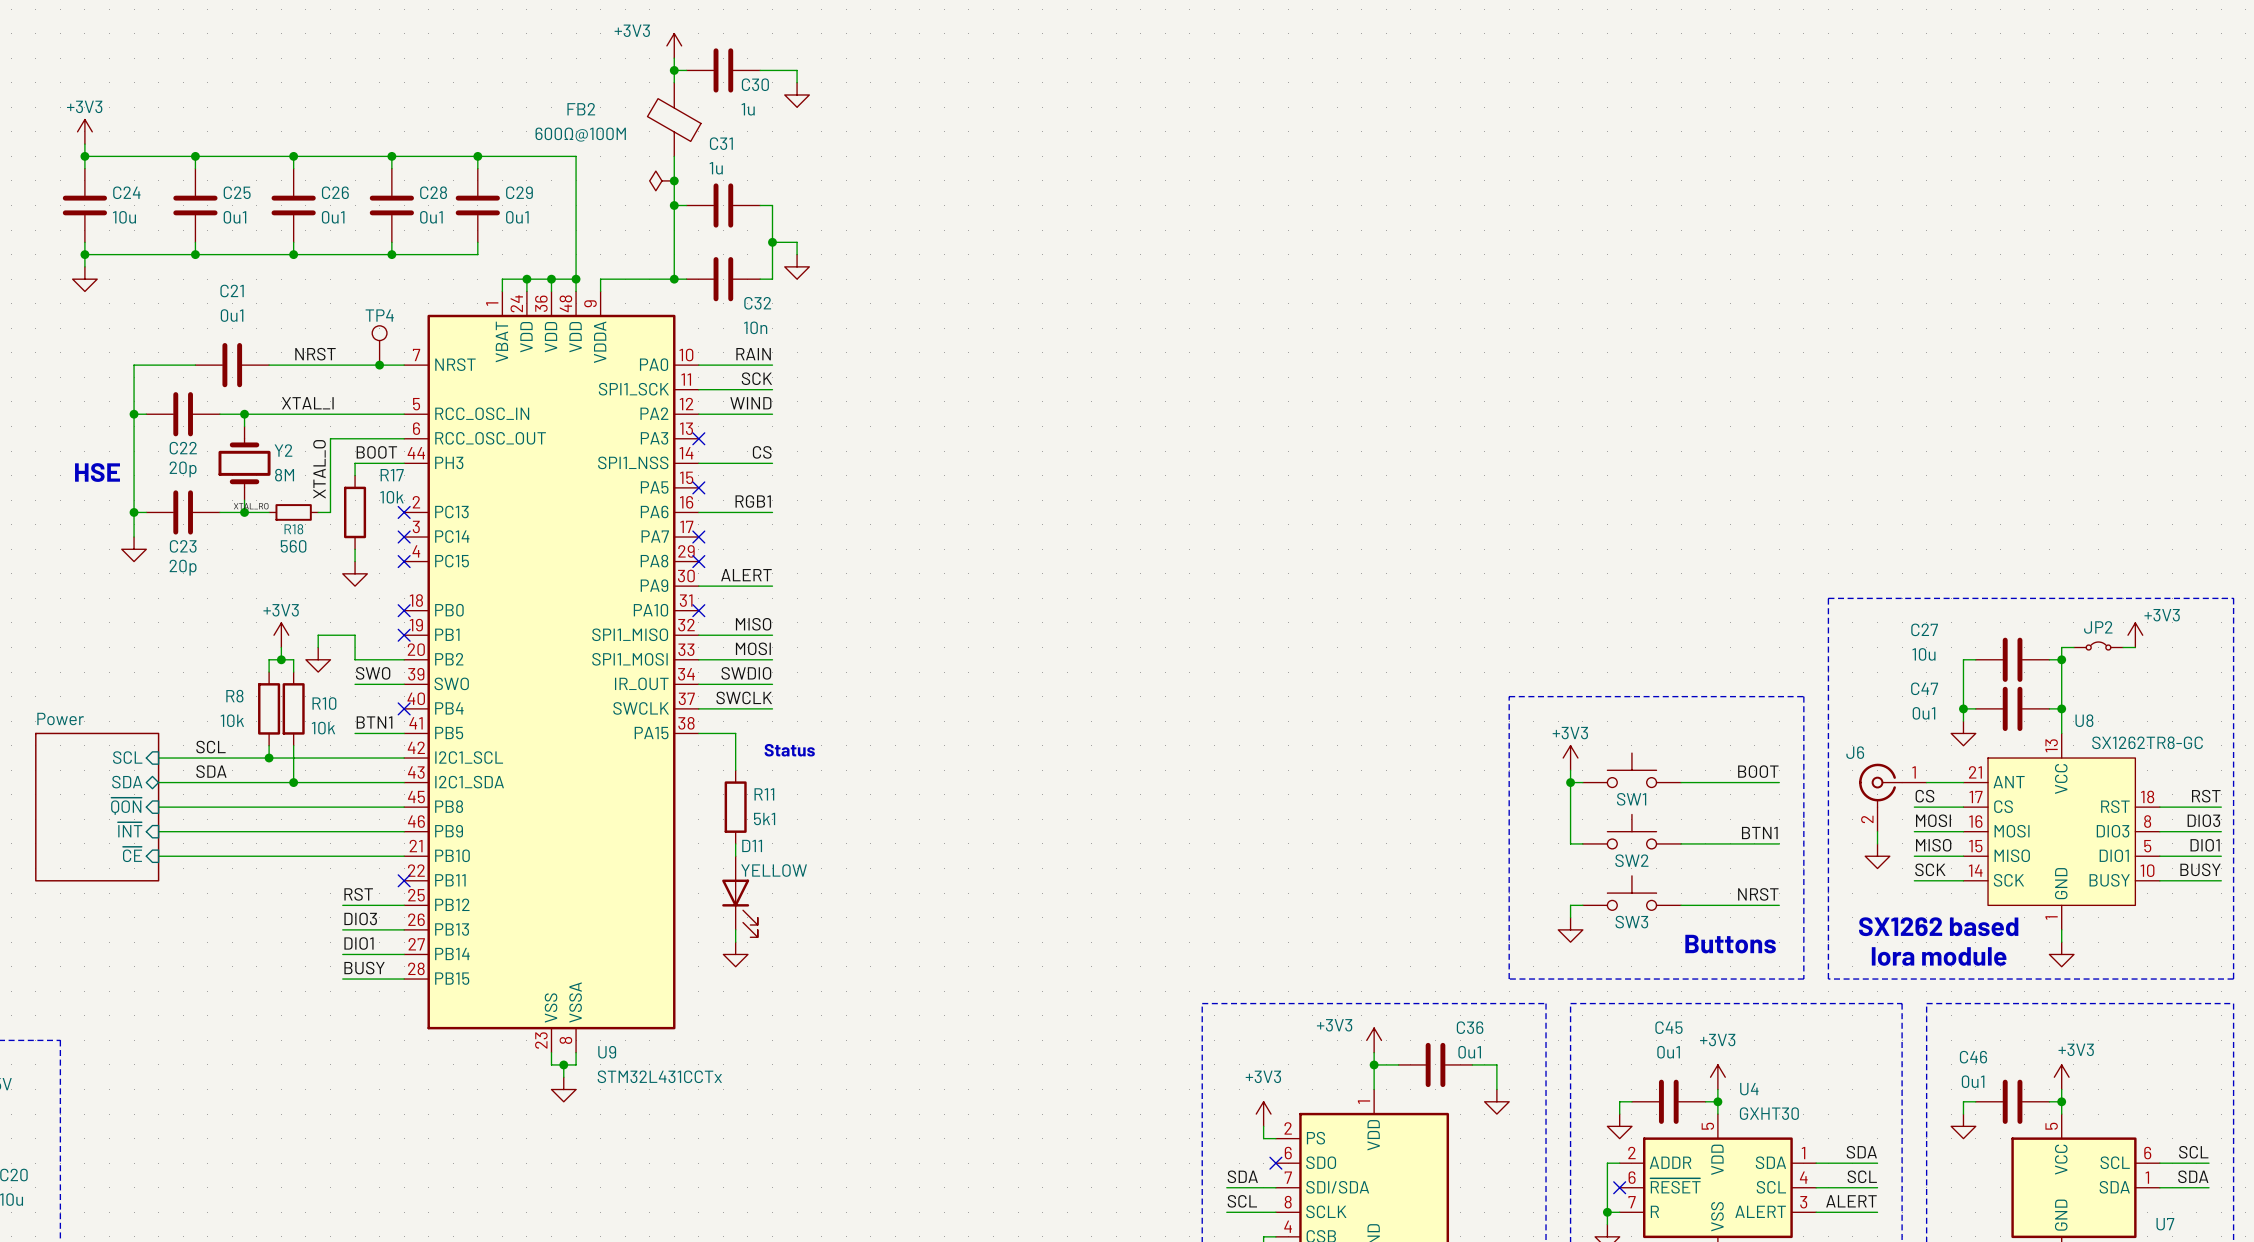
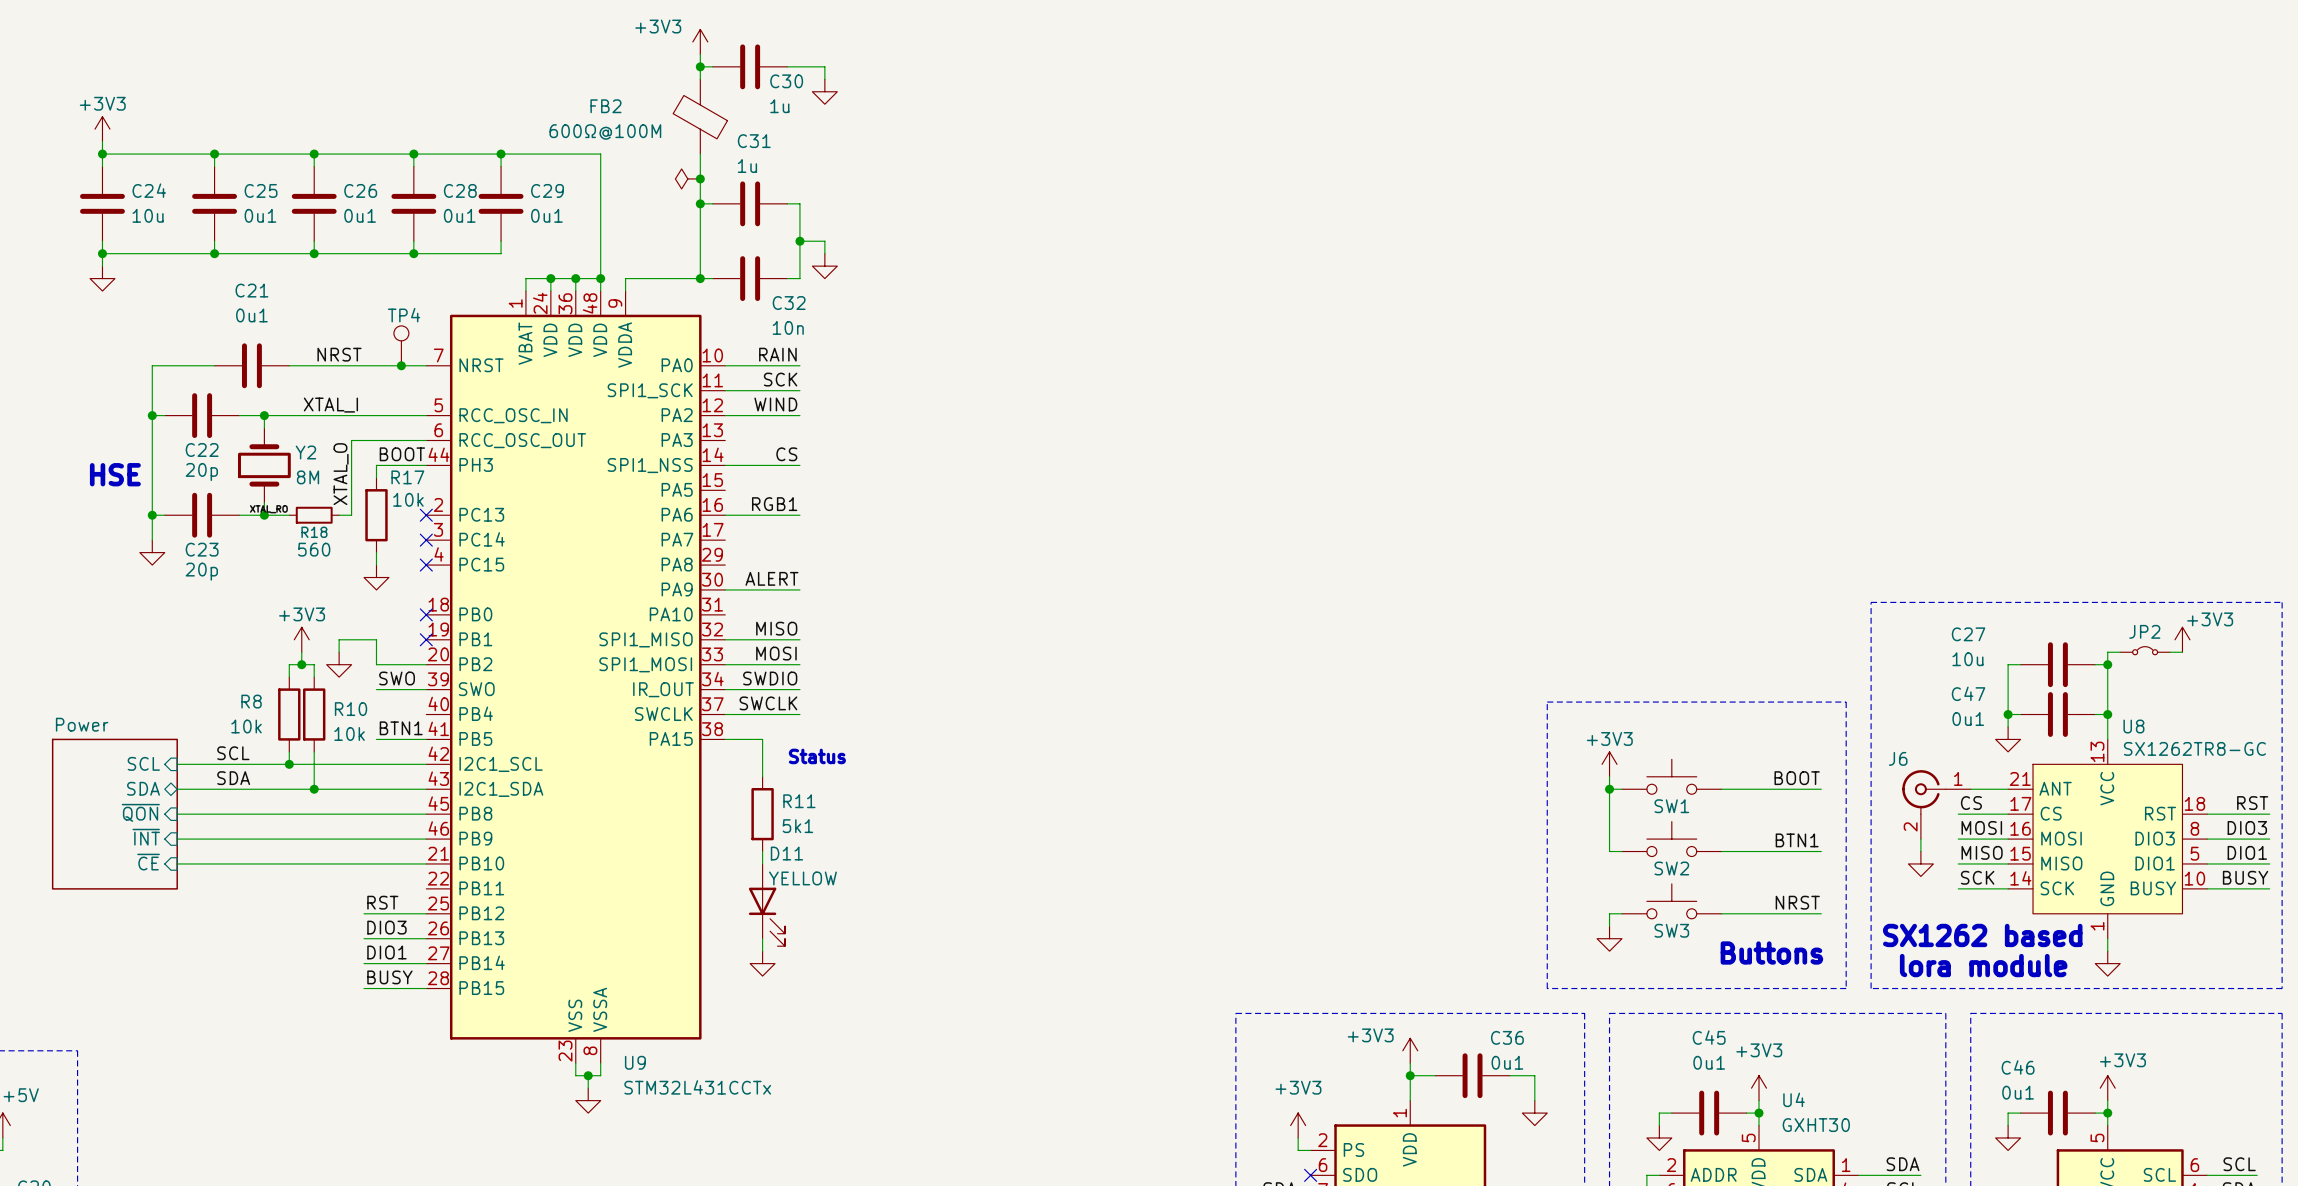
no-connect mark: (698, 438) -> none
no-connect mark: (698, 487) -> none
no-connect mark: (698, 537) -> none
no-connect mark: (698, 561) -> none
no-connect mark: (698, 610) -> none
no-connect mark: (404, 708) -> none
no-connect mark: (404, 880) -> none

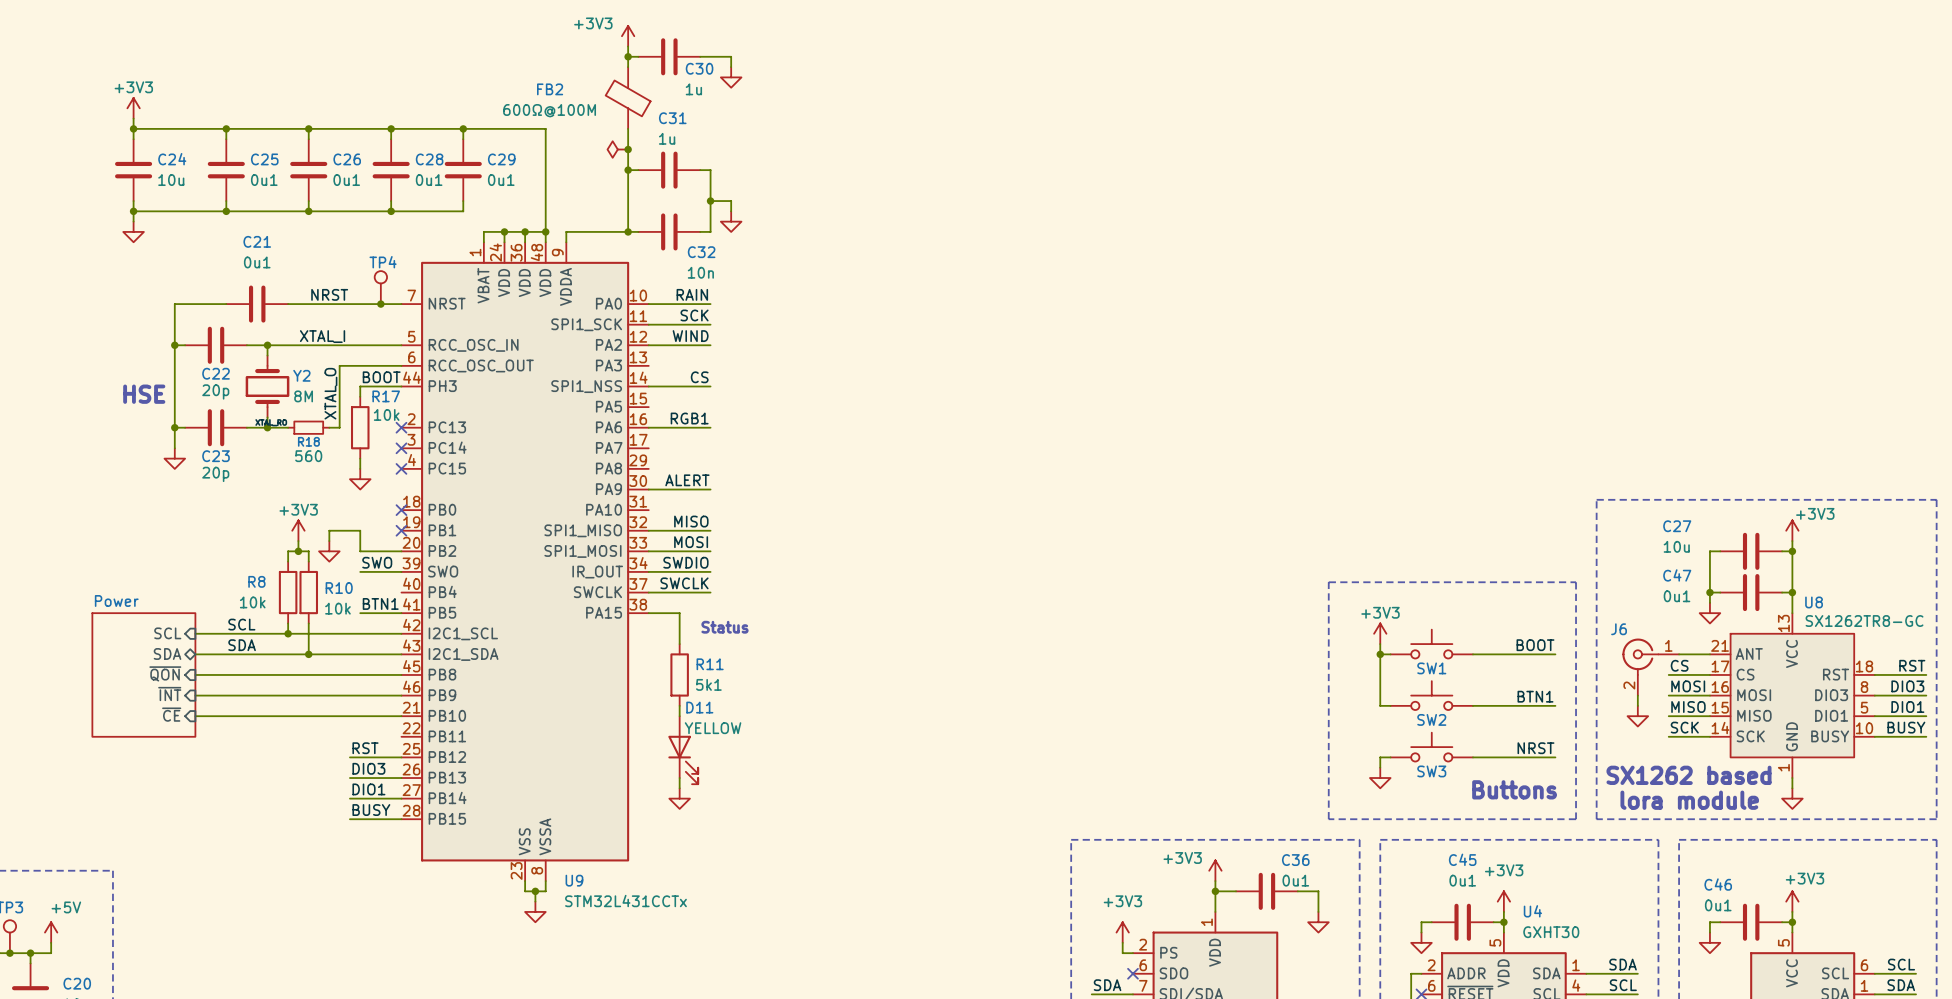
power symbol position: +3V3 (2182, 639) -> +3V3 (1792, 530)
JP2: (2145, 650) -> none
wire: (2107, 652) (2120, 652) -> none
wire: (2170, 652) (2182, 652) -> none

